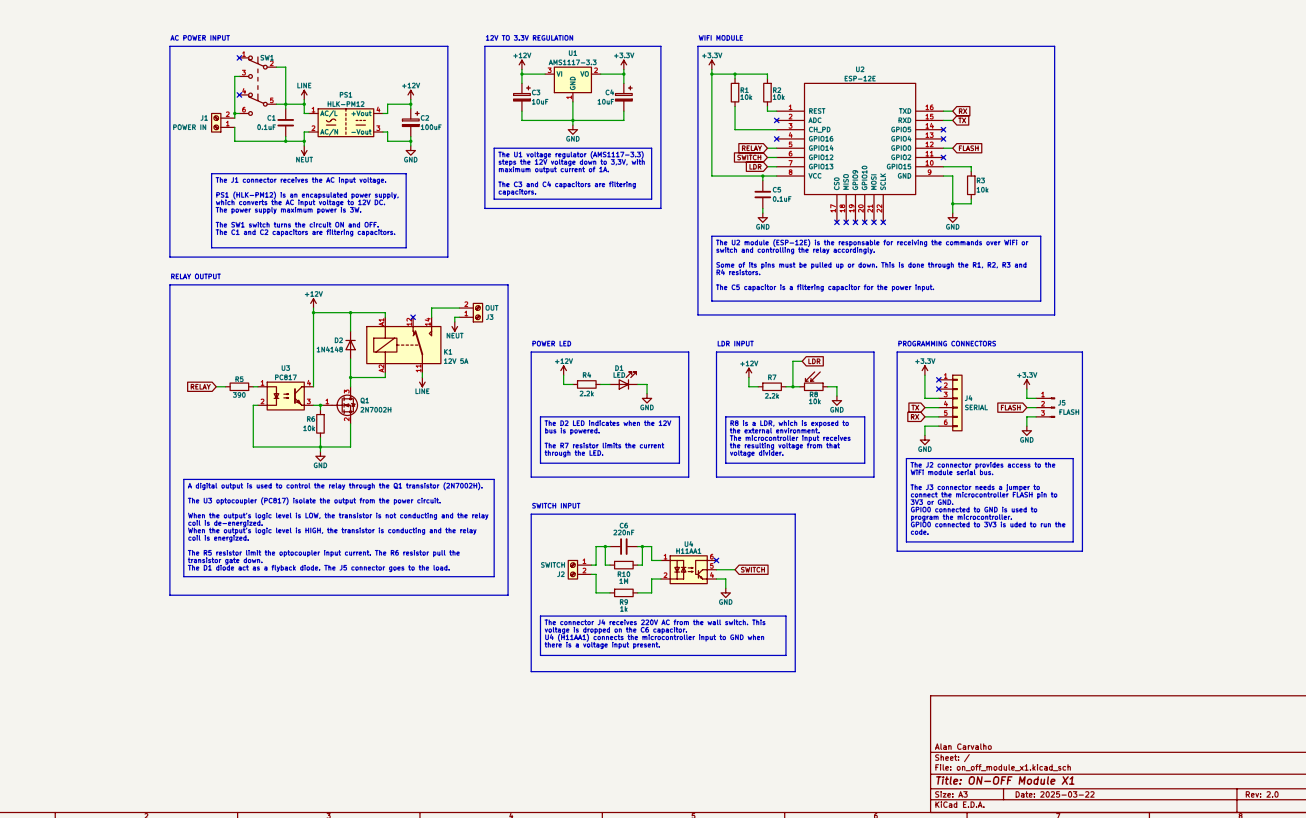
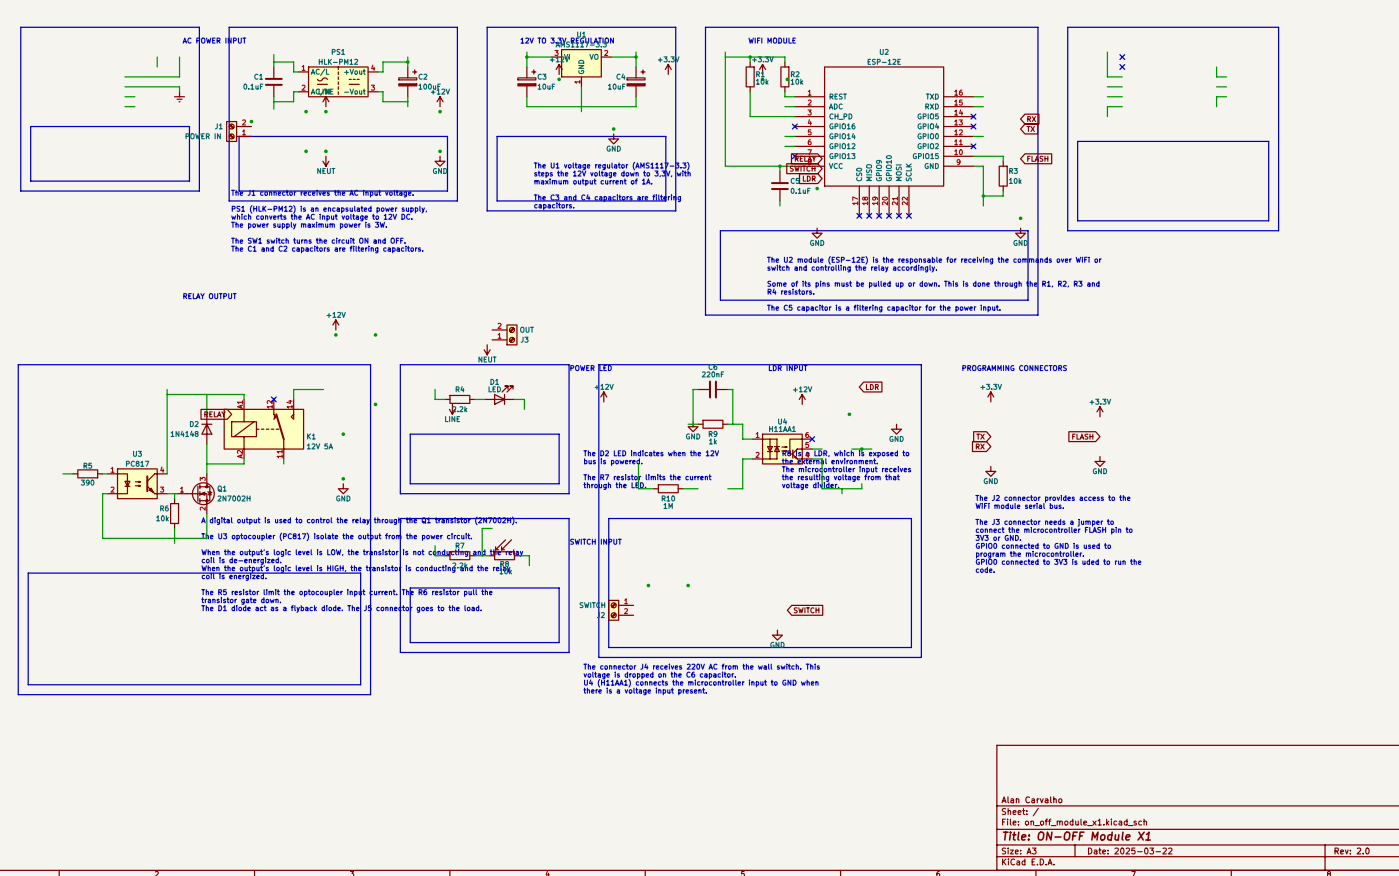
line: none -> (20, 27) (199, 27) (199, 191) (20, 191) (20, 27)
line: none -> (229, 27) (457, 27) (457, 200) (229, 200) (229, 27)
line: none -> (1067, 27) (1278, 27) (1278, 230) (1067, 230) (1067, 27)
line: (169, 46) (447, 46) (447, 257) (169, 257) (169, 46) -> none
line: (484, 46) (660, 46) (660, 208) (484, 208) (484, 46) -> (487, 27) (487, 210) (675, 210) (675, 27) (487, 27)
line: (697, 46) (1054, 46) (1054, 314) (697, 314) (697, 46) -> (705, 27) (705, 315) (1037, 315) (1037, 27) (705, 27)
wire: none -> (1107, 52) (1107, 76) (1122, 76)
wire: none -> (273, 54) (273, 66)
wire: none -> (157, 57) (157, 66)
wire: none -> (179, 57) (179, 76) (124, 76)
junction: none -> (526, 57)
junction: none -> (636, 57)
junction: none -> (750, 57)
no-connect mark: none -> (1122, 57)
no-connect mark: (239, 57) -> none
wire: none -> (273, 62) (293, 62) (293, 71) (296, 71)
junction: none -> (407, 62)
no-connect mark: none -> (1122, 66)
wire: none -> (1216, 66) (1216, 76) (1226, 76)
wire: (278, 67) (285, 67) (285, 108) -> none
wire: (521, 69) (521, 83) -> (526, 52) (526, 66)
wire: (623, 69) (623, 83) -> (636, 52) (636, 66)
wire: (711, 69) (711, 176) (776, 176) -> (725, 52) (725, 166) (794, 166)
wire: (521, 74) (545, 74) -> (526, 57) (551, 57)
wire: (600, 74) (623, 74) -> (611, 57) (636, 57)
junction: (623, 74) -> none
wire: (711, 74) (767, 74) (767, 78) -> (725, 57) (784, 57) (784, 62)
wire: (735, 74) (735, 78) -> (750, 57) (750, 62)
wire: (239, 76) (234, 76) (234, 118) -> none
wire: none -> (124, 86) (179, 86) (179, 91)
wire: none -> (1107, 86) (1122, 86)
wire: none -> (1216, 86) (1226, 86)
part position: (572, 84) -> (581, 67)
part: (257, 85) -> none
wire: none -> (298, 91) (293, 91) (293, 101) (273, 101)
wire: none -> (124, 96) (134, 96)
power symbol: none -> (179, 96)
wire: none -> (273, 96) (273, 109)
wire: none -> (1107, 96) (1122, 96)
wire: none -> (1226, 96) (1216, 96) (1216, 106)
part position: (735, 92) -> (750, 76)
part position: (767, 92) -> (784, 76)
no-connect mark: (239, 94) -> none
part position: (521, 97) -> (526, 81)
part position: (623, 97) -> (636, 81)
wire: none -> (124, 106) (134, 106)
wire: (304, 99) (304, 113) (308, 113) -> none
wire: (410, 99) (410, 108) -> (407, 57) (407, 66)
wire: none -> (1122, 106) (1107, 106) (1107, 116)
wire: (572, 101) (572, 125) -> (581, 86) (581, 111)
wire: (276, 104) (304, 104) -> none
wire: (410, 104) (387, 104) (387, 113) (382, 113) -> (407, 62) (382, 62) (382, 71) (378, 71)
wire: (735, 106) (735, 129) (776, 129) -> (750, 91) (750, 116) (794, 116)
wire: (767, 106) (767, 111) (776, 111) -> (784, 91) (784, 96) (794, 96)
no-connect mark: none -> (973, 116)
wire: (521, 111) (521, 120) (623, 120) (623, 111) -> (526, 96) (526, 106) (636, 106) (636, 96)
wire: (943, 111) (952, 111) -> (973, 96) (983, 96)
wire: (234, 113) (239, 113) -> none
line: none -> (30, 126) (189, 126) (189, 181) (30, 181) (30, 126)
no-connect mark: none -> (794, 126)
no-connect mark: none -> (973, 126)
no-connect mark: (776, 120) -> none
wire: (943, 120) (952, 120) -> (973, 106) (983, 106)
part position: (285, 122) -> (273, 81)
part position: (345, 122) -> (338, 81)
part position: (410, 122) -> (407, 81)
line: none -> (239, 136) (447, 136) (447, 191) (239, 191) (239, 136)
wire: (234, 127) (234, 141) (304, 141) -> none
line: none -> (497, 136) (665, 136) (665, 200) (497, 200) (497, 136)
no-connect mark: (943, 129) -> none
wire: (308, 132) (304, 132) (304, 145) -> none
wire: (382, 132) (387, 132) (387, 141) (410, 141) -> (378, 91) (382, 91) (382, 101) (407, 101)
line: none -> (1077, 141) (1268, 141) (1268, 220) (1077, 220) (1077, 141)
wire: (285, 136) (285, 141) -> none
wire: (410, 136) (410, 145) -> (407, 96) (407, 106)
no-connect mark: none -> (973, 146)
no-connect mark: (776, 138) -> none
no-connect mark: (943, 138) -> none
no-connect mark: none -> (794, 156)
line: (494, 148) (494, 199) (651, 199) (651, 148) (494, 148) -> none
wire: (767, 148) (776, 148) -> (784, 136) (794, 136)
wire: (943, 148) (952, 148) -> (973, 136) (983, 136)
part position: (860, 152) -> (884, 141)
junction: none -> (779, 166)
wire: (767, 157) (776, 157) -> (784, 146) (794, 146)
no-connect mark: (943, 157) -> none
wire: (767, 166) (776, 166) -> (784, 106) (794, 106)
wire: (943, 166) (971, 166) (971, 171) -> (973, 156) (1003, 156) (1003, 161)
line: (211, 173) (406, 173) (406, 247) (211, 247) (211, 173) -> none
wire: (762, 176) (762, 180) -> (779, 166) (779, 171)
wire: (943, 176) (952, 176) (952, 213) -> (973, 166) (983, 166) (983, 205)
junction: none -> (983, 195)
part position: (971, 185) -> (1003, 176)
part position: (762, 194) -> (779, 186)
wire: (971, 199) (971, 203) (952, 203) -> (1003, 191) (1003, 195) (983, 195)
no-connect mark: none -> (859, 215)
no-connect mark: none -> (869, 215)
no-connect mark: none -> (879, 215)
no-connect mark: none -> (889, 215)
no-connect mark: none -> (899, 215)
no-connect mark: none -> (908, 215)
wire: (762, 208) (762, 213) -> (779, 200) (779, 205)
line: none -> (720, 230) (1028, 230) (1028, 300) (720, 300) (720, 230)
no-connect mark: (836, 222) -> none
no-connect mark: (846, 222) -> none
no-connect mark: (855, 222) -> none
no-connect mark: (864, 222) -> none
no-connect mark: (873, 222) -> none
no-connect mark: (883, 222) -> none
line: (711, 236) (1040, 236) (1040, 301) (711, 301) (711, 236) -> none
line: (169, 284) (169, 595) (508, 595) (508, 284) (169, 284) -> none
wire: (313, 308) (313, 386) -> none
wire: (459, 308) (431, 308) (431, 317) -> none
wire: (313, 312) (385, 312) (385, 317) -> none
wire: (350, 312) (350, 331) -> none
no-connect mark: (413, 317) -> none
wire: (459, 317) (454, 317) (454, 321) -> none
line: none -> (18, 364) (370, 364) (370, 694) (18, 694) (18, 364)
line: none -> (598, 364) (921, 364) (921, 657) (598, 657) (598, 364)
part position: (350, 345) -> (206, 429)
part position: (403, 345) -> (263, 429)
line: (531, 352) (688, 352) (688, 477) (531, 477) (531, 460) -> (569, 377) (569, 364) (400, 364) (400, 493) (569, 493)
line: (716, 352) (873, 352) (873, 477) (716, 477) (716, 352) -> none
line: (897, 352) (1082, 352) (1082, 551) (897, 551) (897, 352) -> none
wire: (350, 358) (350, 386) -> none
wire: (802, 361) (792, 361) (792, 386) -> none
wire: none -> (167, 389) (167, 473)
wire: none -> (323, 389) (293, 389) (293, 399)
wire: none -> (435, 389) (435, 399) (445, 399)
wire: none -> (727, 389) (732, 389) (732, 424)
wire: none -> (167, 394) (244, 394) (244, 399)
wire: none -> (206, 394) (206, 414)
no-connect mark: none -> (273, 399)
wire: (385, 372) (385, 377) (350, 377) -> none
wire: (422, 372) (422, 377) -> none
wire: none -> (474, 399) (484, 399)
wire: none -> (514, 399) (524, 399) (524, 409)
wire: (563, 375) (563, 384) (572, 384) -> none
wire: (924, 375) (924, 398) (938, 398) -> none
wire: (748, 377) (748, 386) (758, 386) -> none
no-connect mark: (938, 379) -> none
part position: (623, 380) -> (499, 395)
part position: (813, 381) -> (504, 550)
part position: (586, 384) -> (459, 399)
wire: (600, 384) (609, 384) -> (688, 424) (698, 424)
wire: (637, 384) (647, 384) -> (698, 389) (693, 389) (693, 411)
part position: (239, 386) -> (87, 473)
part position: (772, 386) -> (459, 555)
wire: (785, 386) (799, 386) -> none
wire: (827, 386) (836, 386) (836, 396) -> none
no-connect mark: (938, 389) -> none
wire: (1026, 389) (1026, 398) (1036, 398) -> none
part position: (285, 396) -> (137, 483)
wire: none -> (727, 424) (742, 424) (742, 439) (752, 439)
part: (950, 402) -> none
wire: (257, 405) (253, 405) (253, 446) (350, 446) (350, 423) -> none
wire: (313, 405) (322, 405) -> none
wire: (320, 405) (320, 409) -> (283, 458) (283, 463)
part position: (340, 405) -> (195, 493)
line: none -> (410, 434) (410, 483) (559, 483) (559, 434) (410, 434)
wire: (924, 407) (938, 407) -> none
wire: (1026, 407) (1036, 407) -> none
part: (1045, 407) -> none
no-connect mark: none -> (812, 439)
wire: none -> (206, 444) (206, 473)
line: (540, 416) (679, 416) (679, 463) (540, 463) (540, 416) -> none
line: (725, 416) (864, 416) (864, 463) (725, 463) (725, 416) -> none
wire: (924, 416) (938, 416) -> none
wire: (1036, 416) (1026, 416) (1026, 426) -> none
wire: none -> (812, 449) (822, 449)
wire: none -> (851, 449) (871, 449)
wire: none -> (861, 449) (861, 454)
junction: none -> (861, 449)
part position: (320, 423) -> (174, 513)
wire: (938, 426) (924, 426) (924, 435) -> none
wire: none -> (244, 458) (244, 463) (206, 463)
wire: none -> (752, 458) (742, 458) (742, 488) (727, 488)
wire: none -> (812, 458) (822, 458) (822, 488) (861, 488) (861, 483)
wire: none -> (638, 463) (638, 488) (653, 488)
wire: (320, 437) (320, 451) -> none
wire: none -> (62, 473) (72, 473)
wire: none -> (102, 473) (107, 473)
wire: none -> (683, 488) (698, 488)
wire: none -> (841, 488) (841, 493)
line: (906, 458) (1073, 458) (1073, 541) (906, 541) (906, 458) -> none
wire: none -> (107, 493) (102, 493) (102, 538) (206, 538) (206, 513)
wire: none -> (167, 493) (177, 493)
wire: none -> (174, 493) (174, 498)
line: (183, 479) (494, 479) (494, 576) (183, 576) (183, 479) -> none
line: none -> (608, 518) (911, 518) (911, 647) (608, 647) (608, 518)
wire: none -> (174, 528) (174, 543)
wire: none -> (492, 528) (482, 528) (482, 555)
wire: none -> (435, 545) (435, 555) (445, 555)
line: (531, 514) (795, 514) (795, 671) (531, 671) (531, 609) -> (569, 550) (569, 518) (400, 518) (400, 652) (569, 652)
wire: none -> (474, 555) (489, 555)
wire: none -> (519, 555) (529, 555) (529, 565)
line: none -> (28, 573) (360, 573) (360, 684) (28, 684) (28, 573)
wire: (605, 546) (605, 565) (609, 565) -> none
wire: (609, 546) (596, 546) (596, 565) (591, 565) -> none
part position: (623, 546) -> (712, 389)
wire: (637, 546) (651, 546) (651, 560) (660, 560) -> none
wire: (642, 546) (642, 565) (637, 565) -> none
line: none -> (410, 587) (559, 587) (559, 642) (410, 642) (410, 587)
no-connect mark: (716, 560) -> none
part position: (623, 565) -> (668, 488)
part position: (688, 569) -> (782, 449)
wire: (716, 569) (735, 569) -> none
wire: (591, 574) (596, 574) (596, 592) (609, 592) -> none
wire: (660, 579) (651, 579) (651, 592) (637, 592) -> none
wire: (716, 579) (725, 579) (725, 588) -> none
part position: (623, 592) -> (712, 424)
line: (540, 616) (540, 655) (785, 655) (785, 616) (540, 616) -> none

